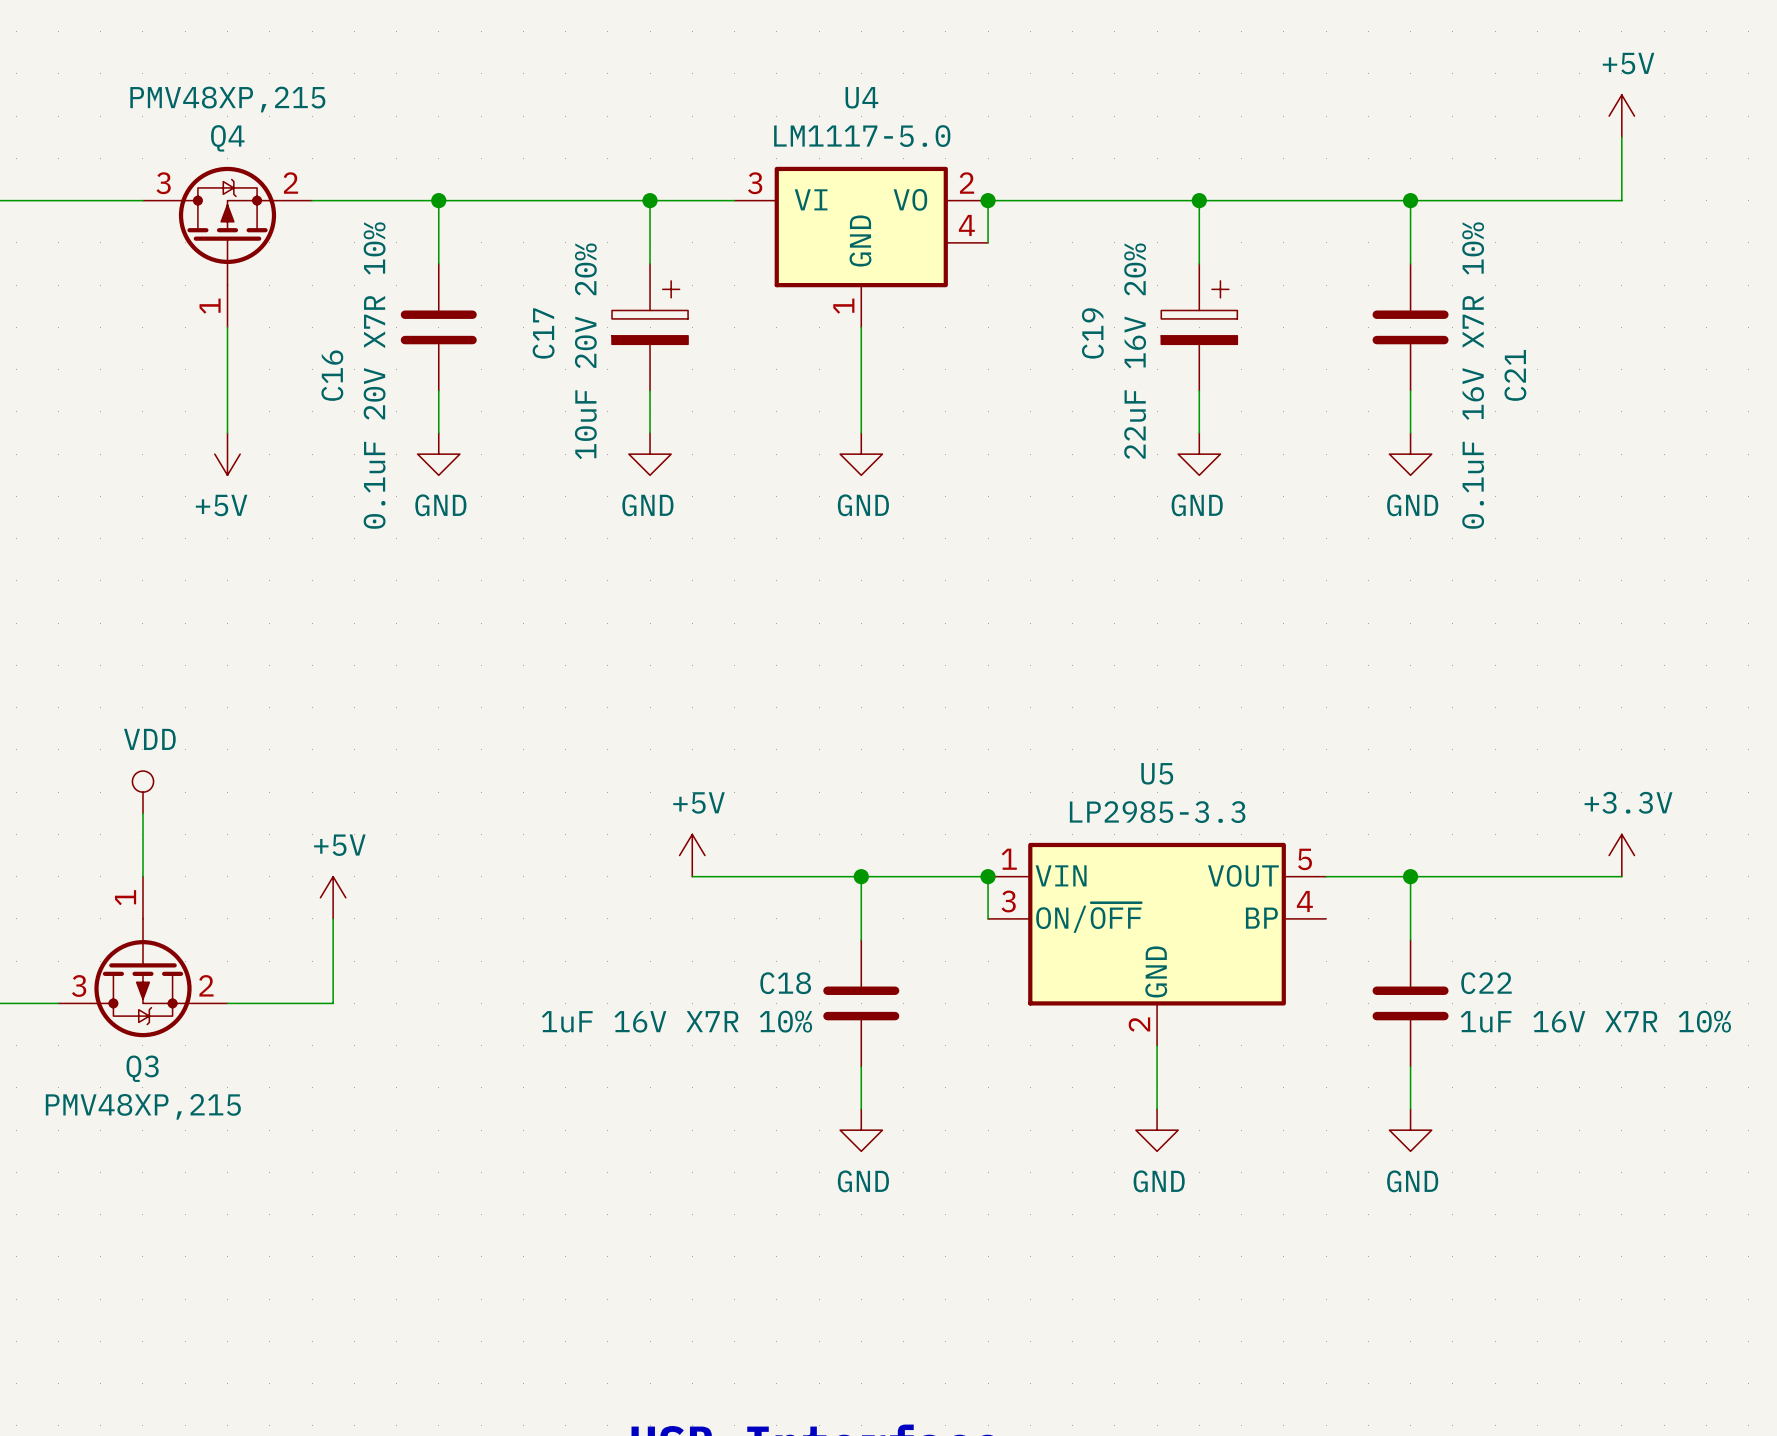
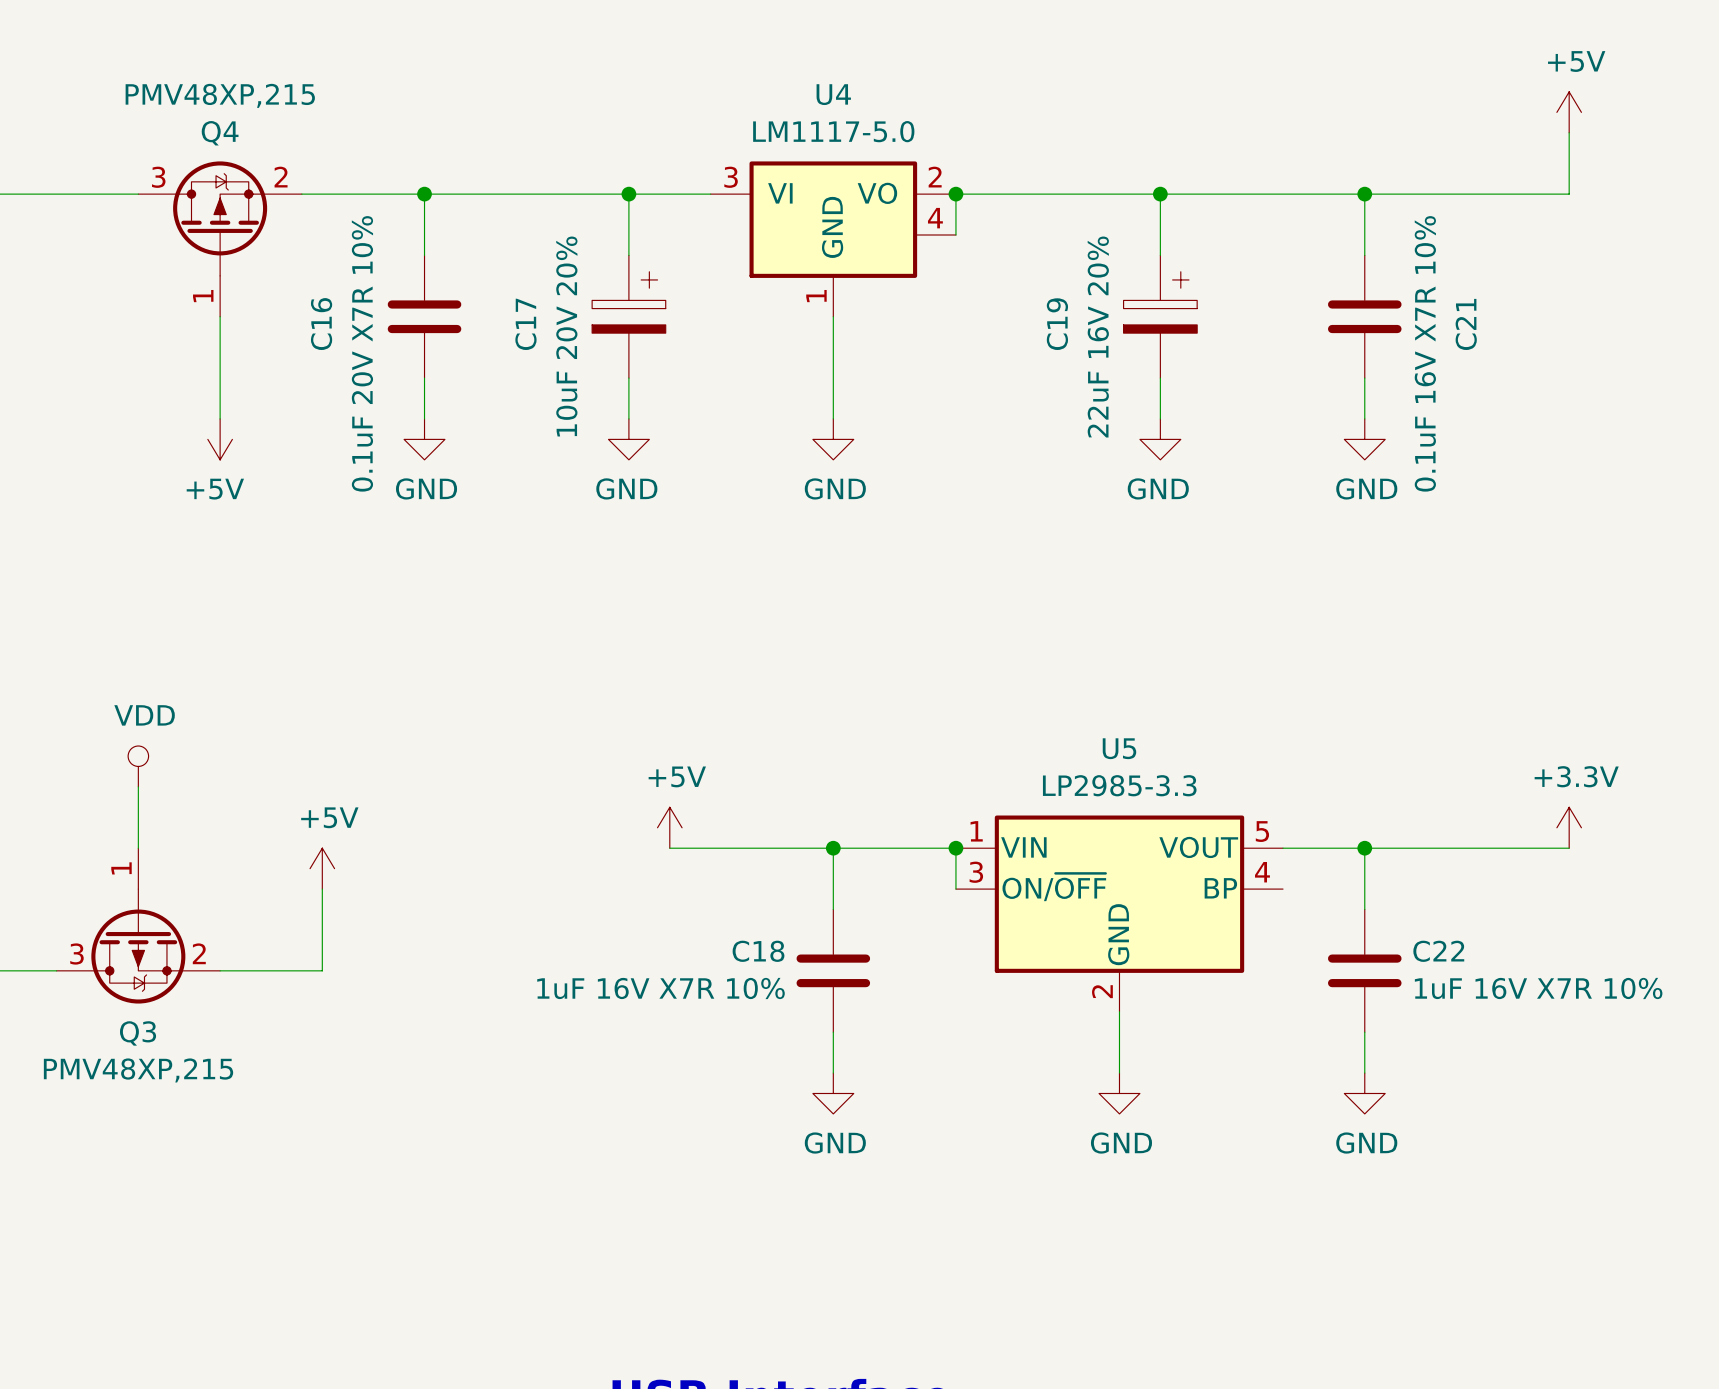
C16 name position: C16 (332, 375) -> C16 (321, 324)
C21 name position: C21 (1515, 375) -> C21 (1466, 324)

